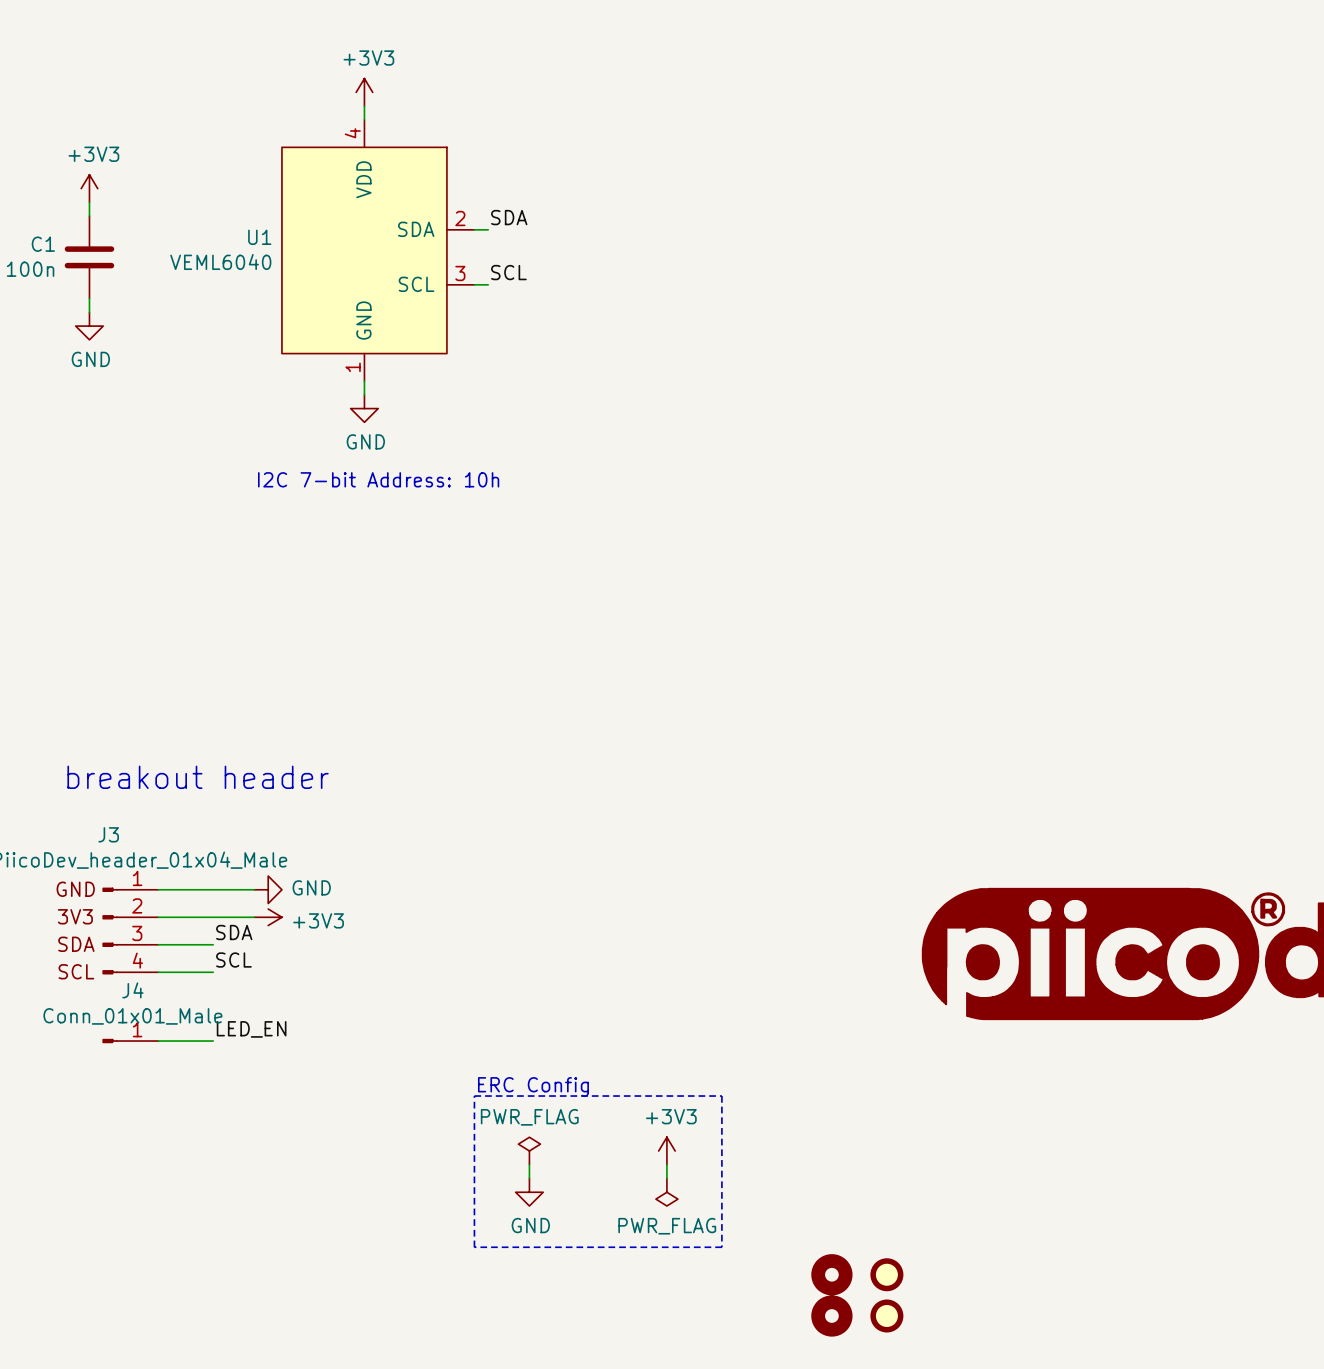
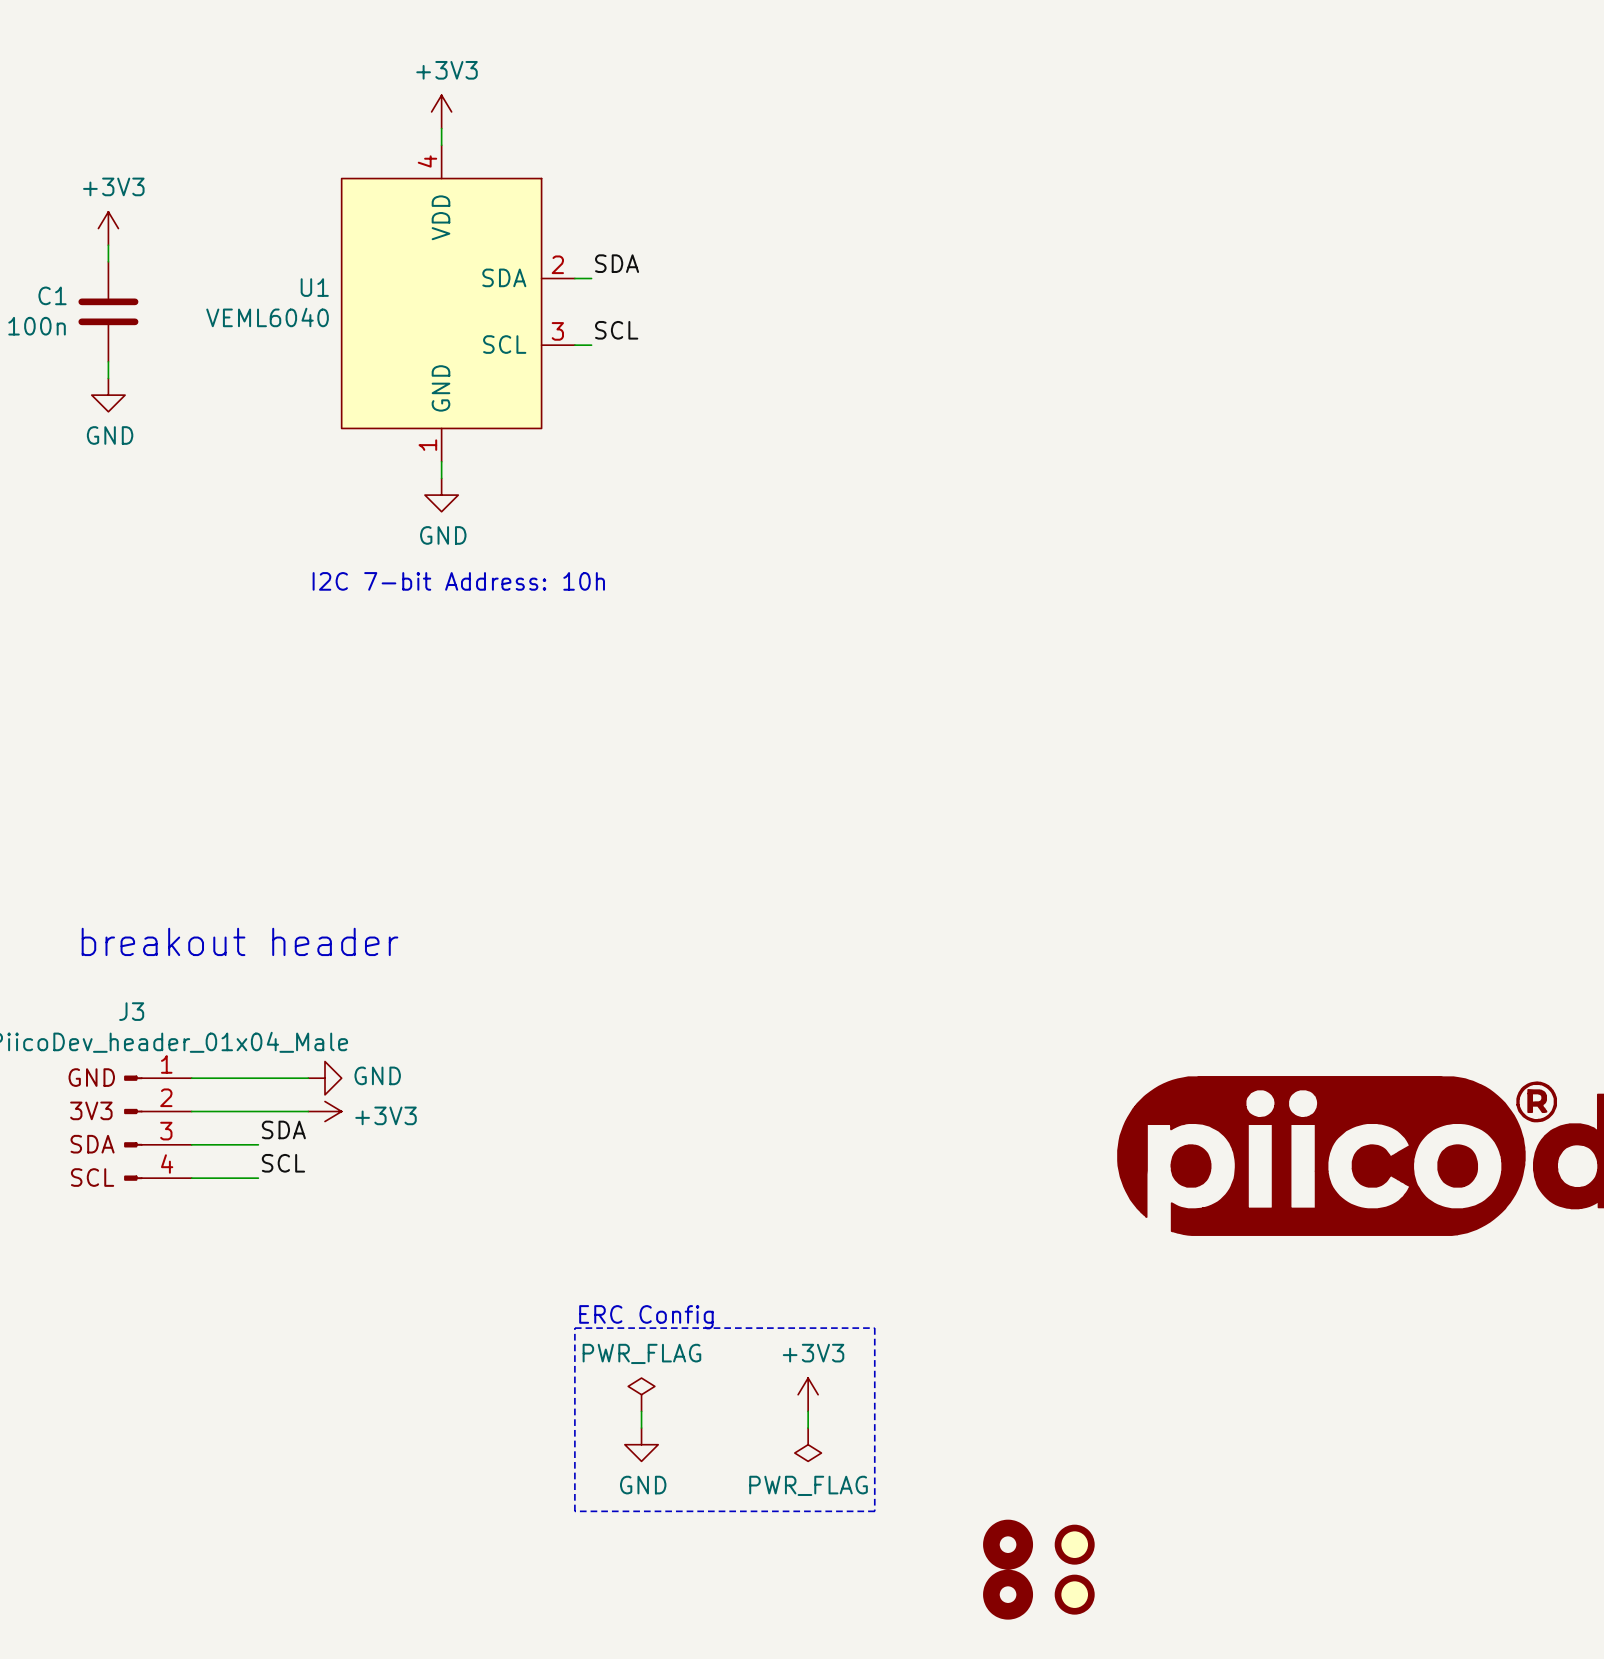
label: LED_EN (251, 1029) -> none
J4: Conn_01x01_Male (130, 1041) -> none
wire: (158, 1041) (213, 1041) -> none

